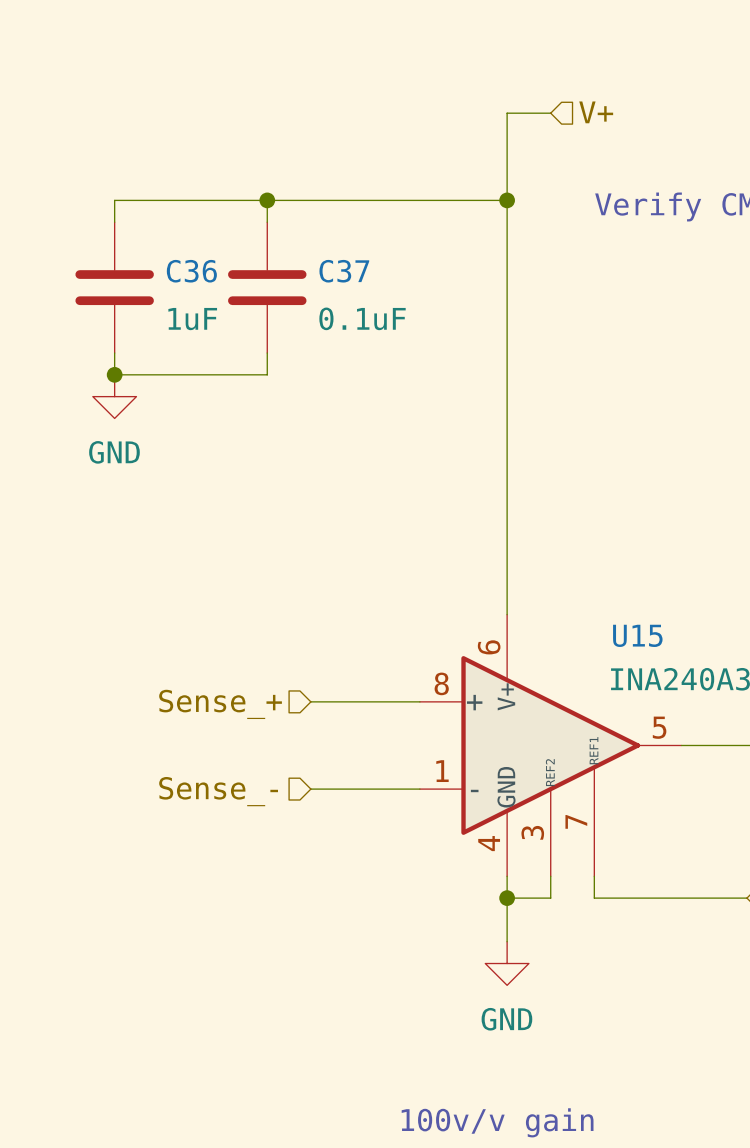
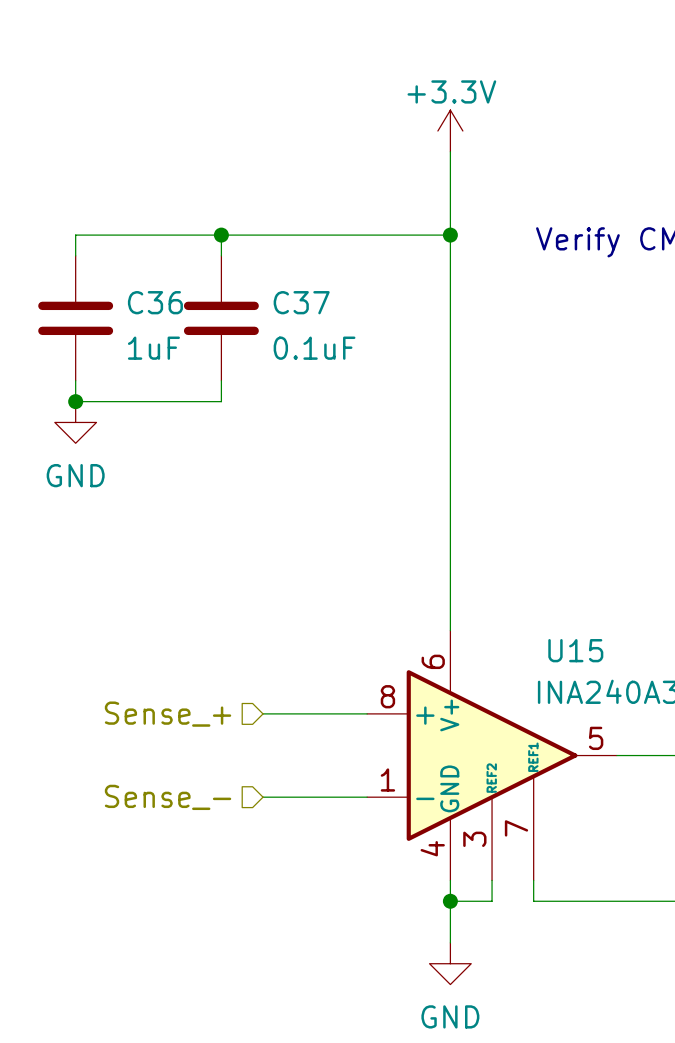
power symbol: none -> +3.3V (450, 131)
hierarchical label: V+ (596, 112) -> none
wire: (507, 113) (550, 113) -> none

